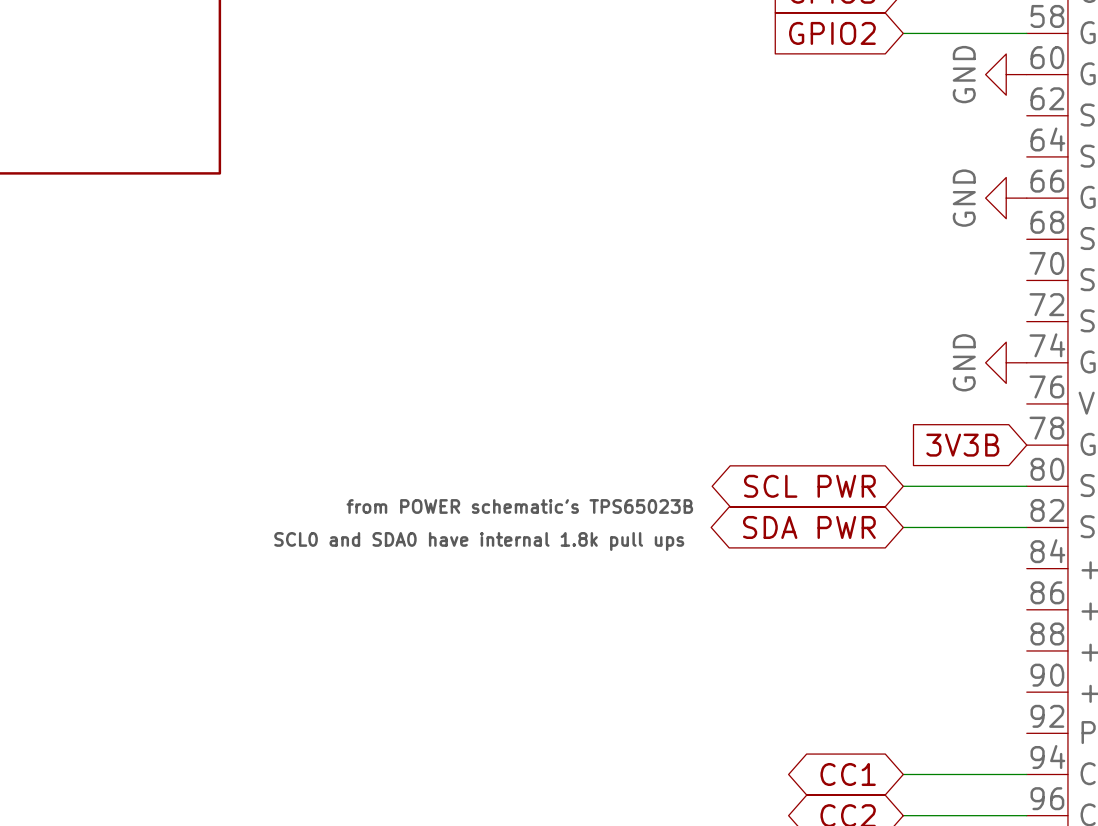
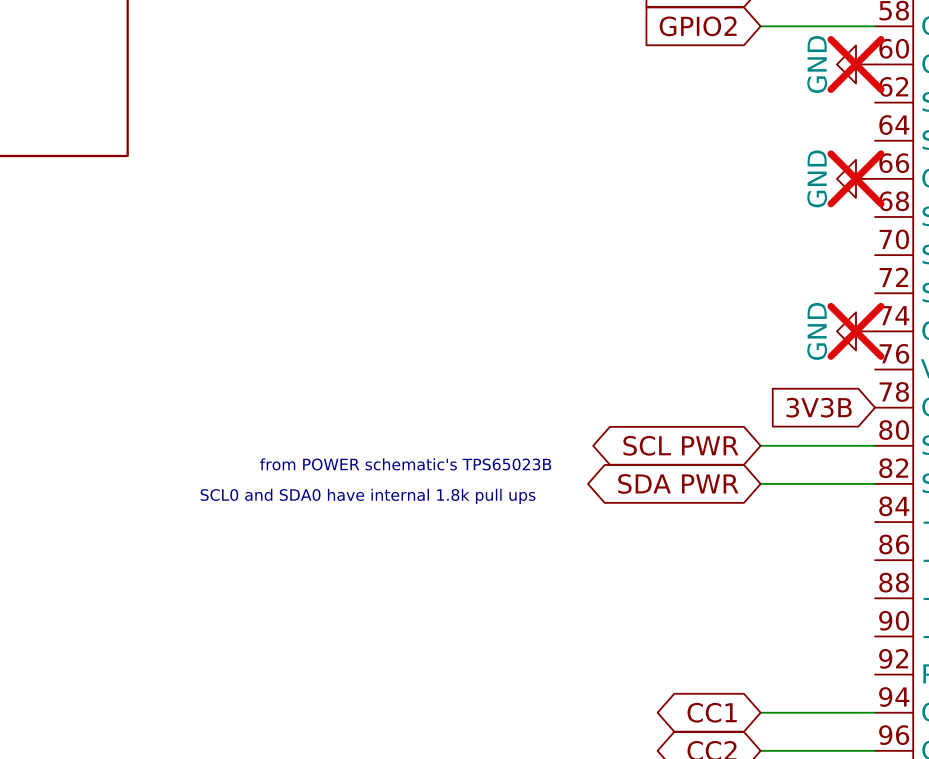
power symbol do-not-place cross: none -> (855, 64)
power symbol do-not-place cross: none -> (855, 178)
power symbol do-not-place cross: none -> (855, 331)

